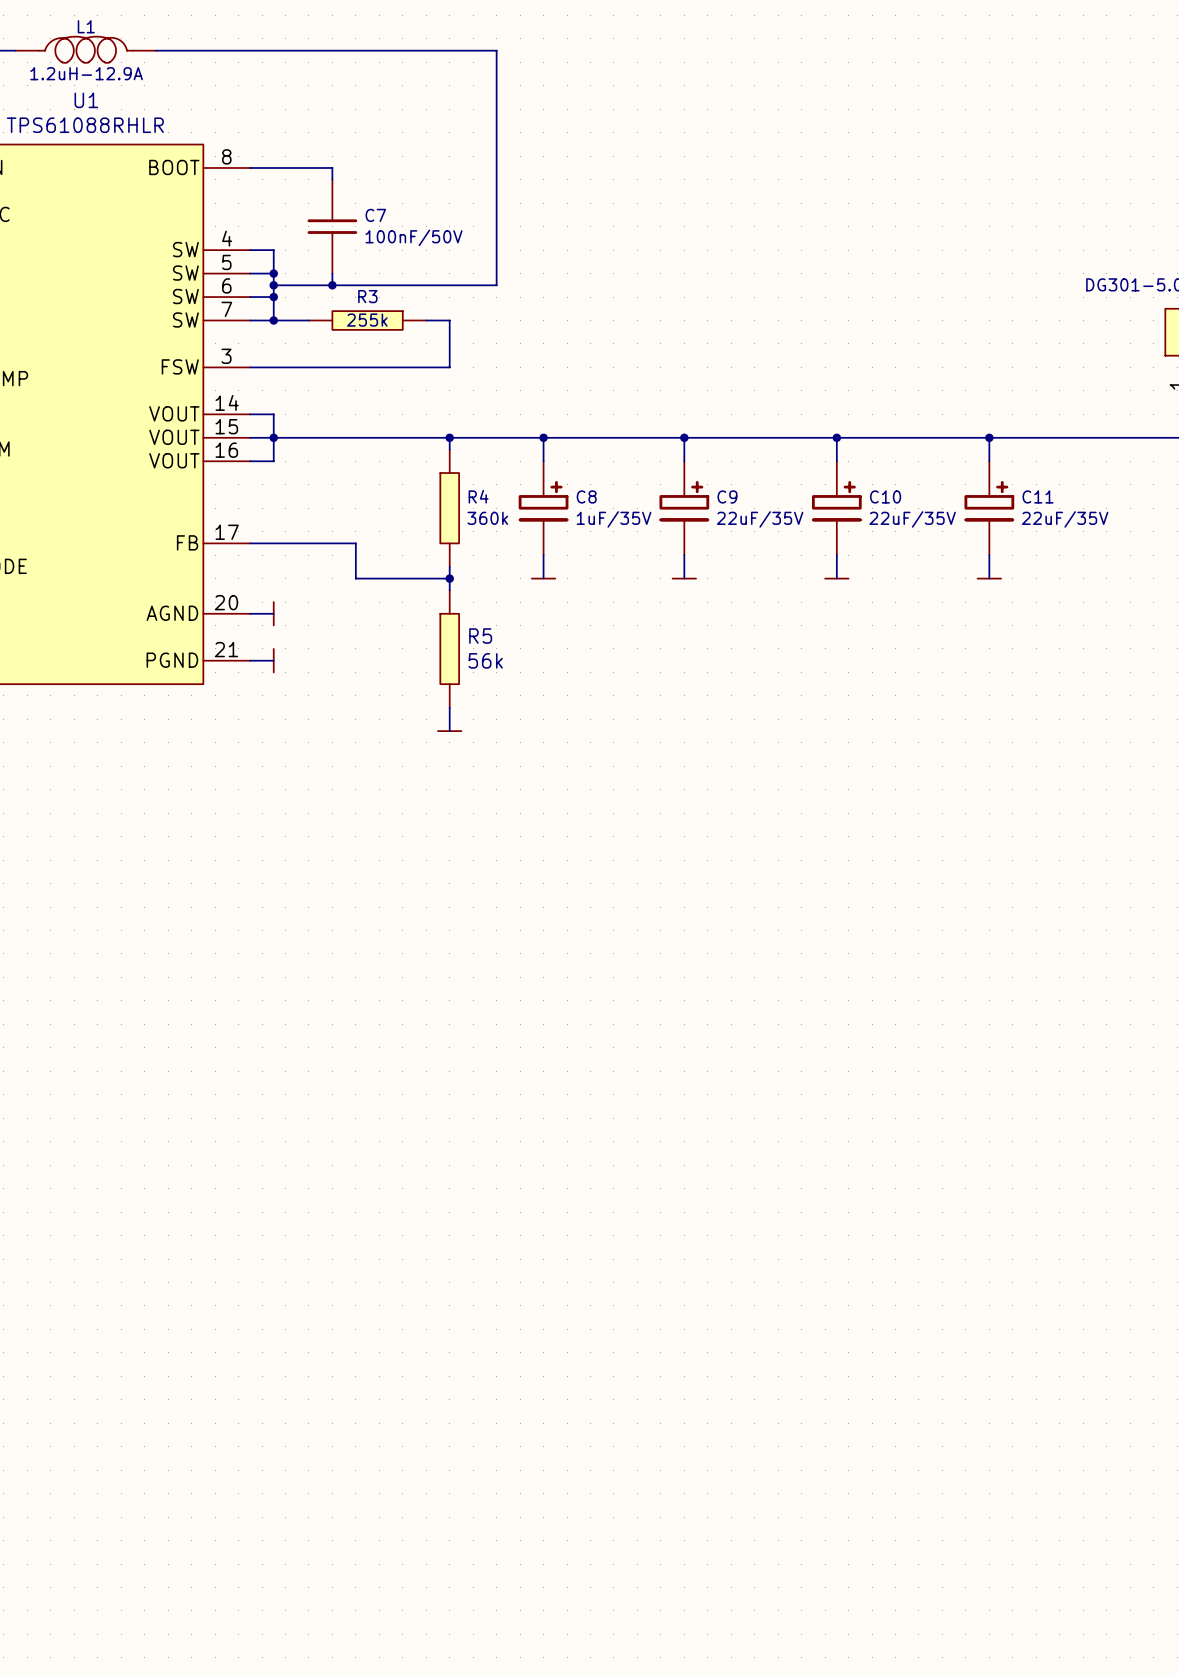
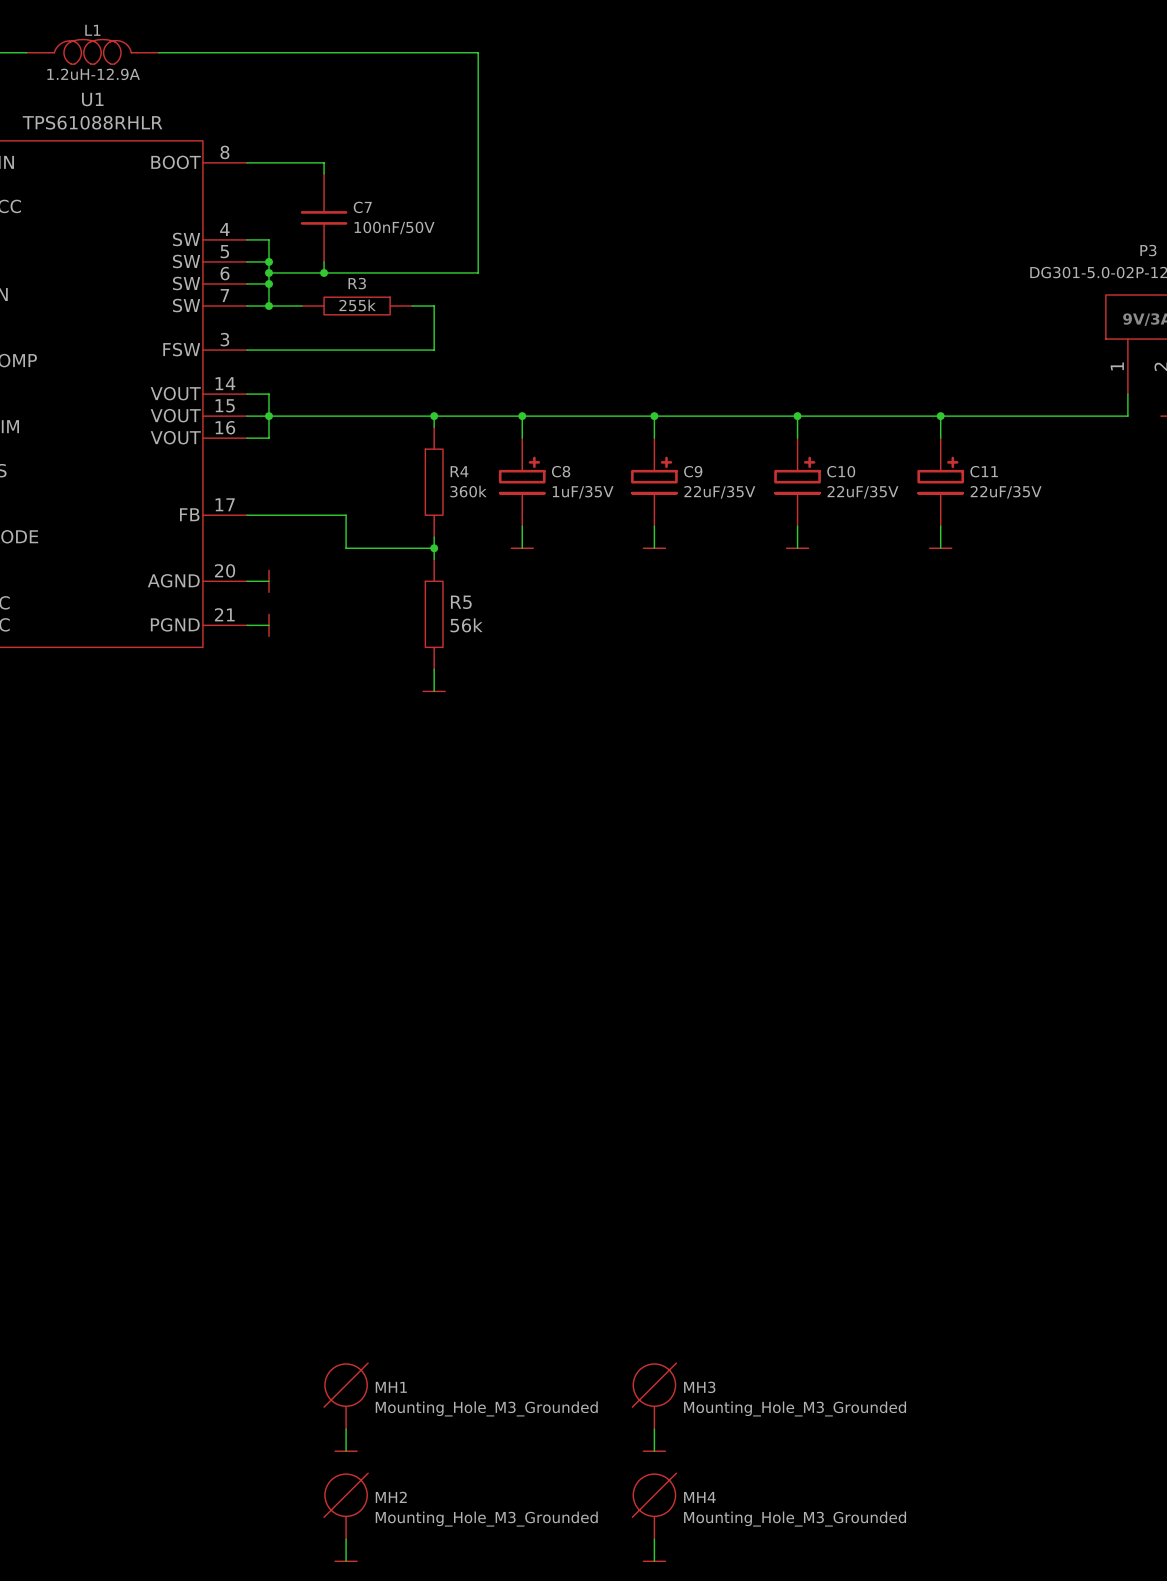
MH1: none -> Mounting_Hole_M3_Grounded (346, 1396)
MH3: none -> Mounting_Hole_M3_Grounded (654, 1396)
wire: none -> (346, 1429) (346, 1451)
wire: none -> (654, 1429) (654, 1451)
power symbol: none -> (346, 1451)
power symbol: none -> (654, 1451)
MH2: none -> Mounting_Hole_M3_Grounded (346, 1506)
MH4: none -> Mounting_Hole_M3_Grounded (654, 1506)
wire: none -> (346, 1539) (346, 1561)
wire: none -> (654, 1539) (654, 1561)
power symbol: none -> (346, 1561)
power symbol: none -> (654, 1561)

